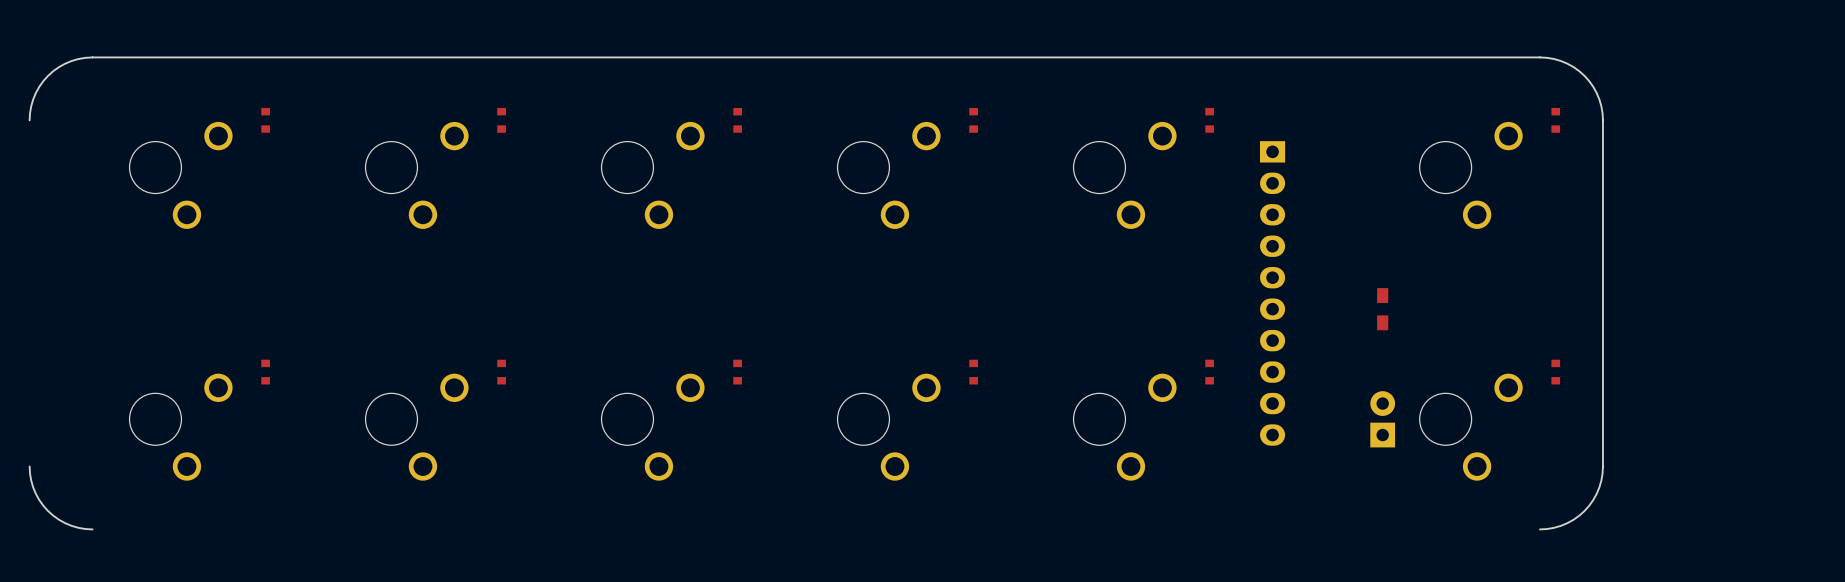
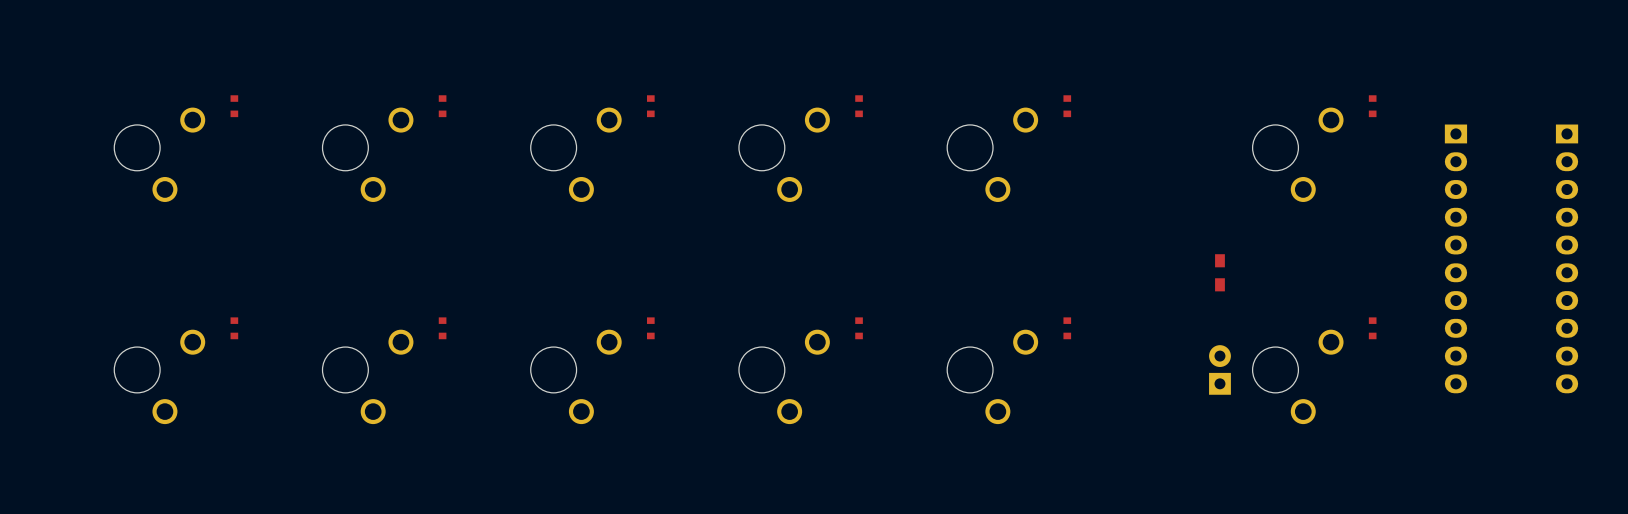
board edge: (29, 120) (31, 106) (35, 93) (48, 75) (65, 63) (78, 59) (92, 57) (1540, 57) (1554, 59) (1573, 67) (1584, 75) (1596, 93) (1602, 113) (1602, 466) (1601, 480) (1596, 493) (1584, 510) (1567, 523) (1554, 527) (1540, 529) -> none
part: (1272, 293) -> none
part: none -> (1455, 258)
part: none -> (1567, 258)
board edge: (29, 466) (31, 480) (35, 493) (48, 510) (65, 523) (78, 527) (92, 529) -> none

